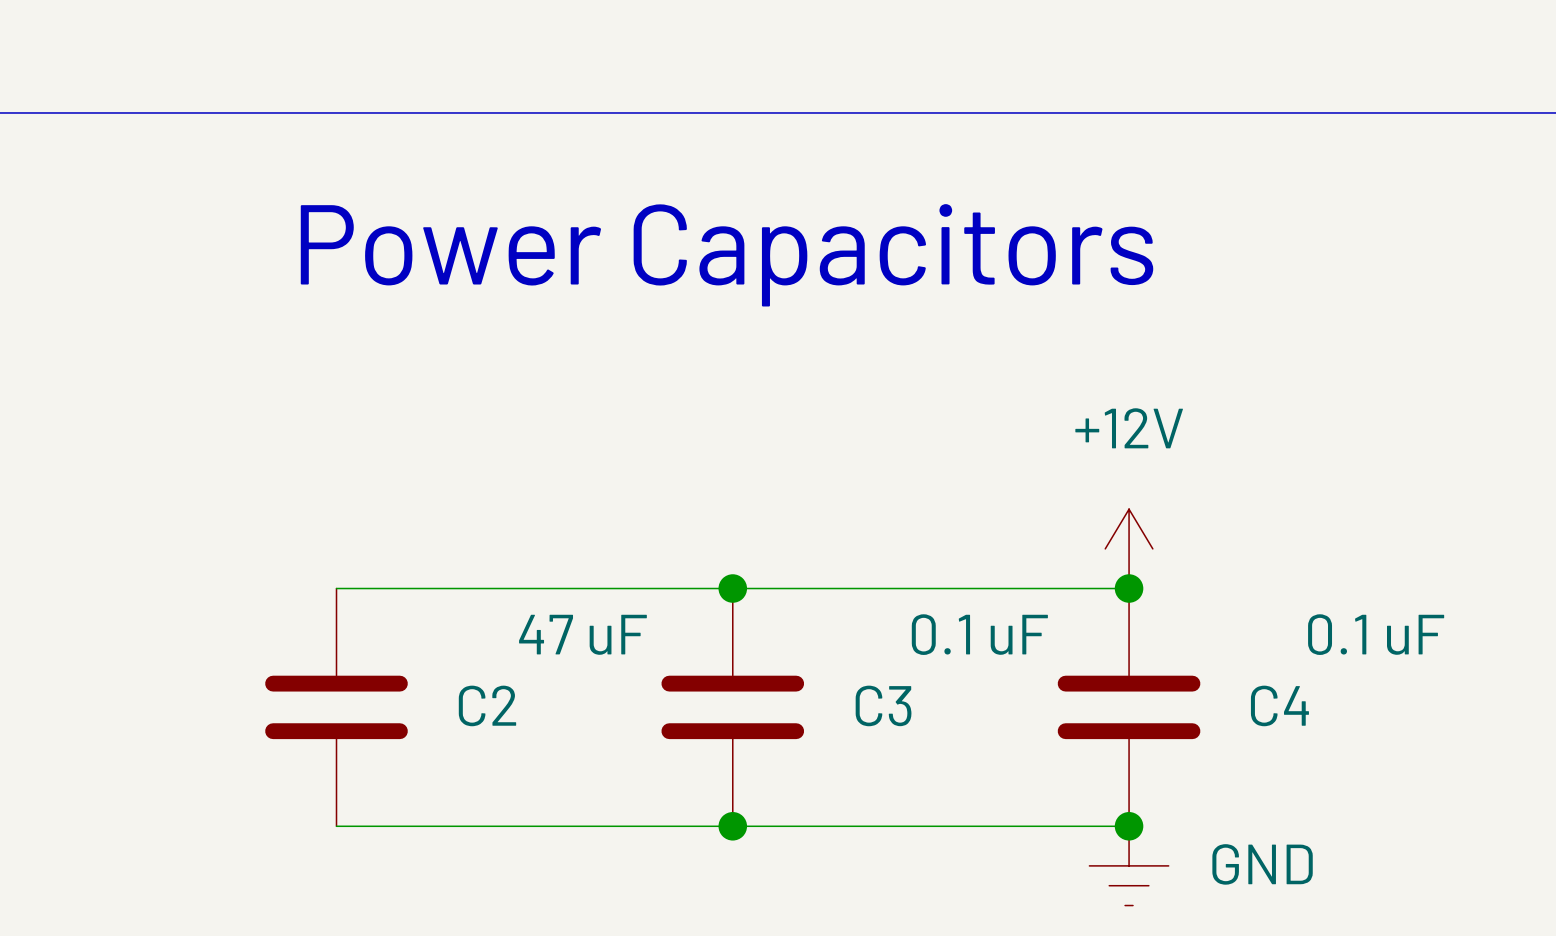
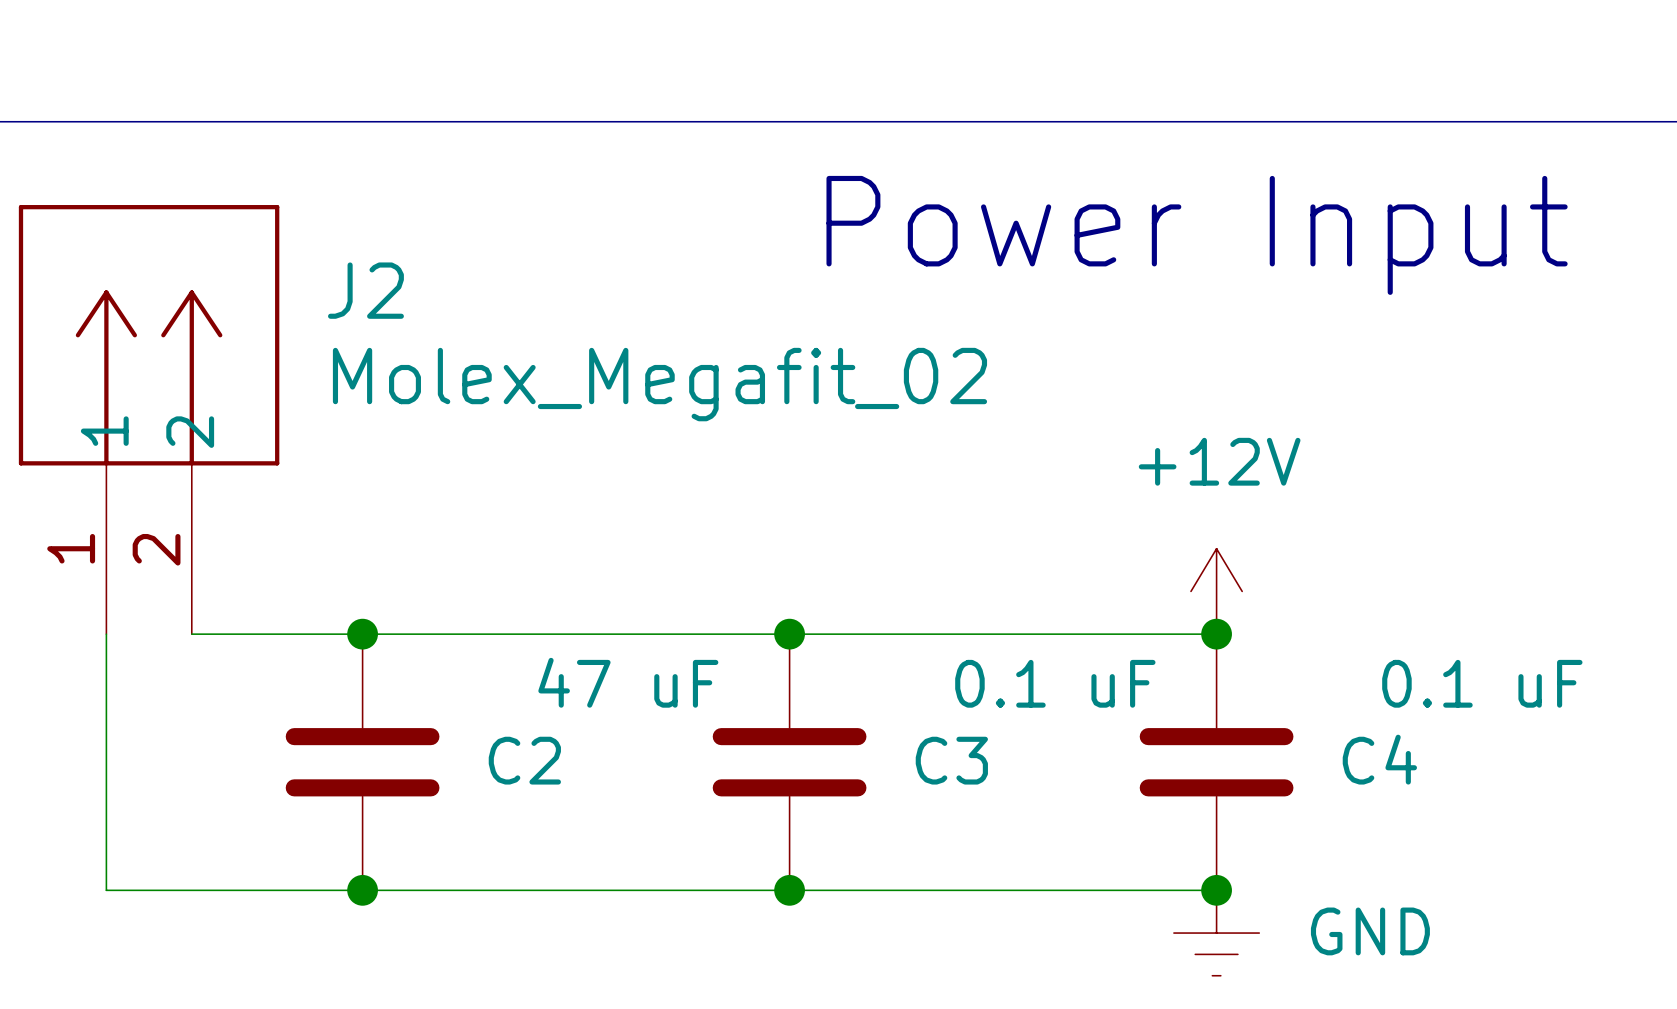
text: none -> Power Input (1197, 235)
text: Power Capacitors (727, 255) -> none
J2: none -> Molex_Megafit_02 (149, 419)
wire: none -> (106, 634) (106, 890) (362, 890)
wire: none -> (191, 634) (362, 634)
junction: none -> (362, 634)
junction: none -> (362, 890)

